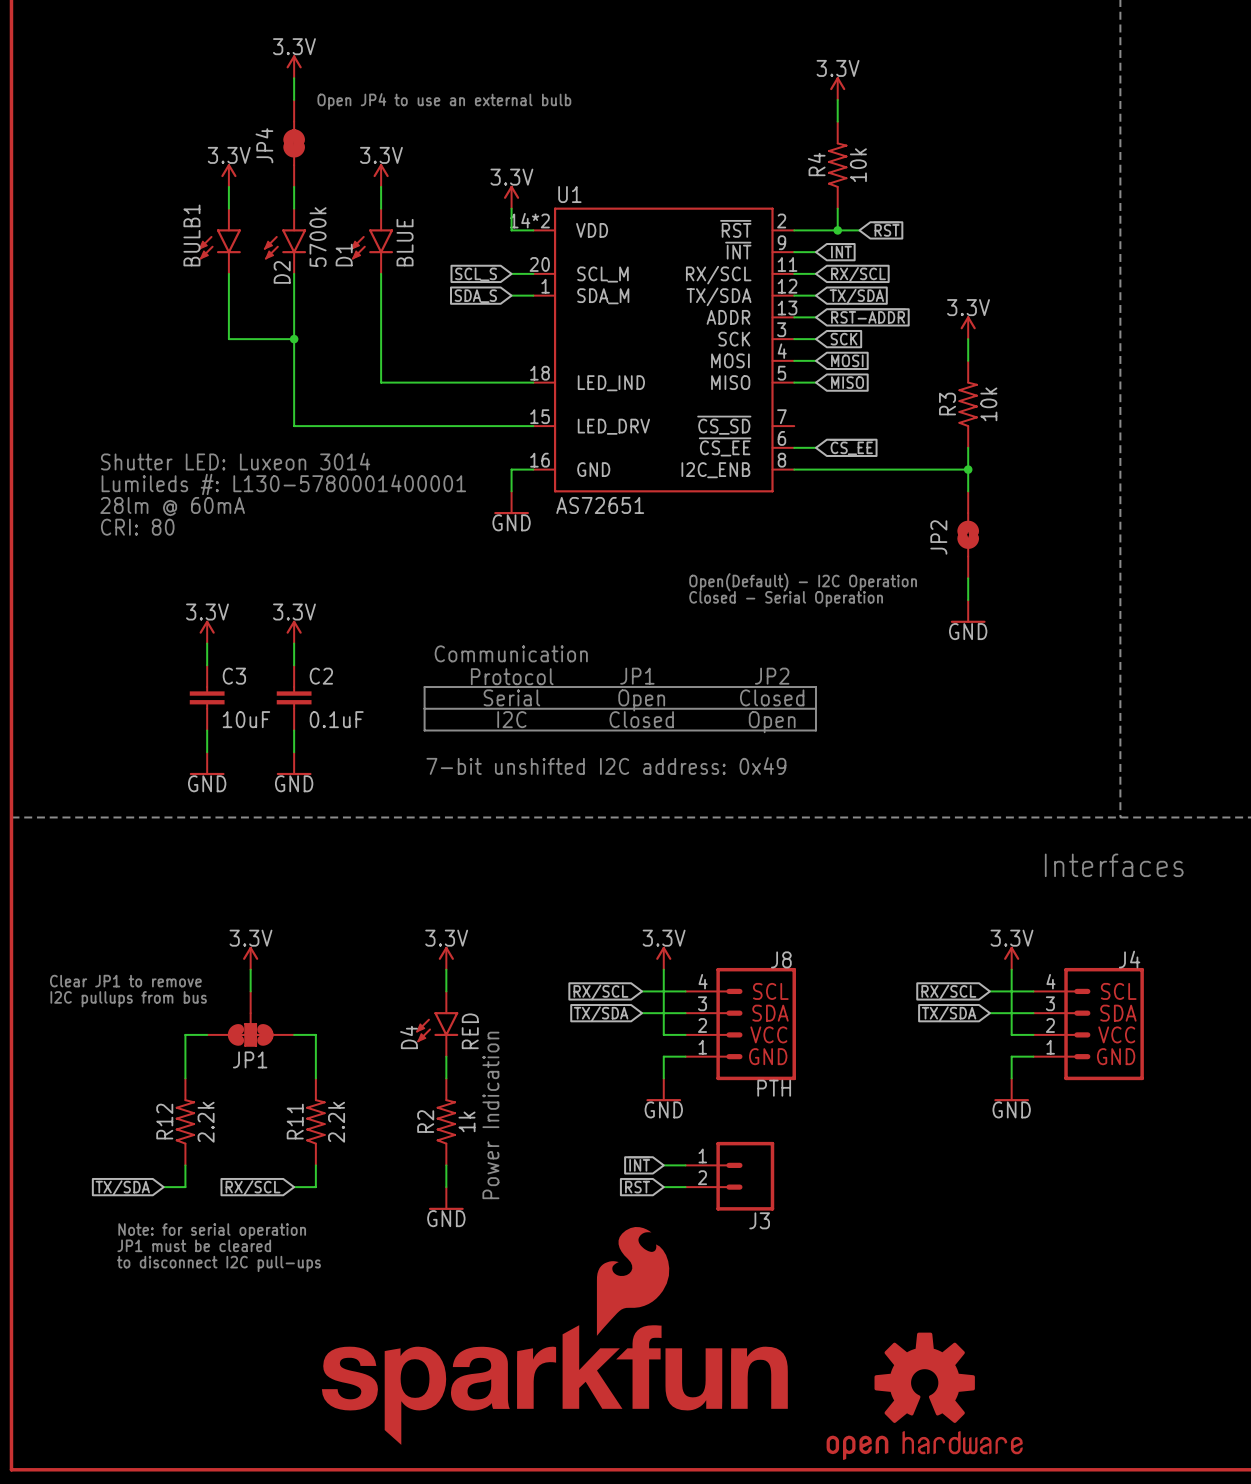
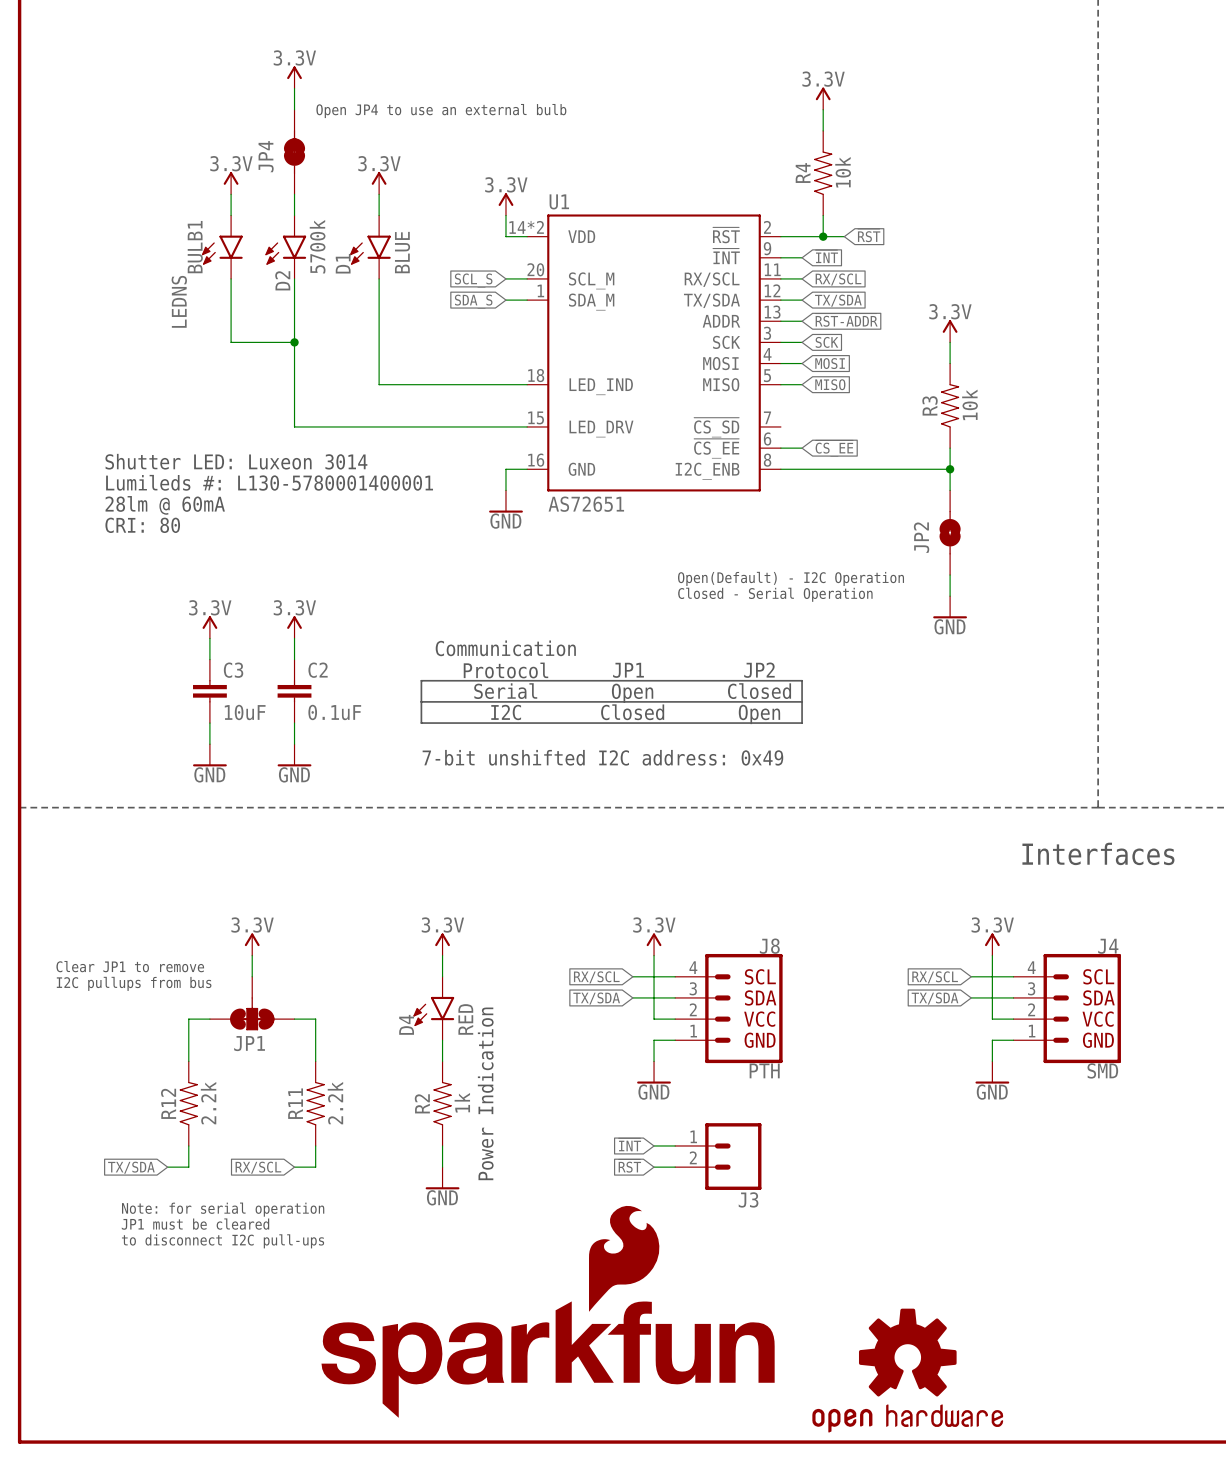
BULB1 value: none -> LEDNS (179, 301)
J4 value: none -> SMD (1102, 1070)

